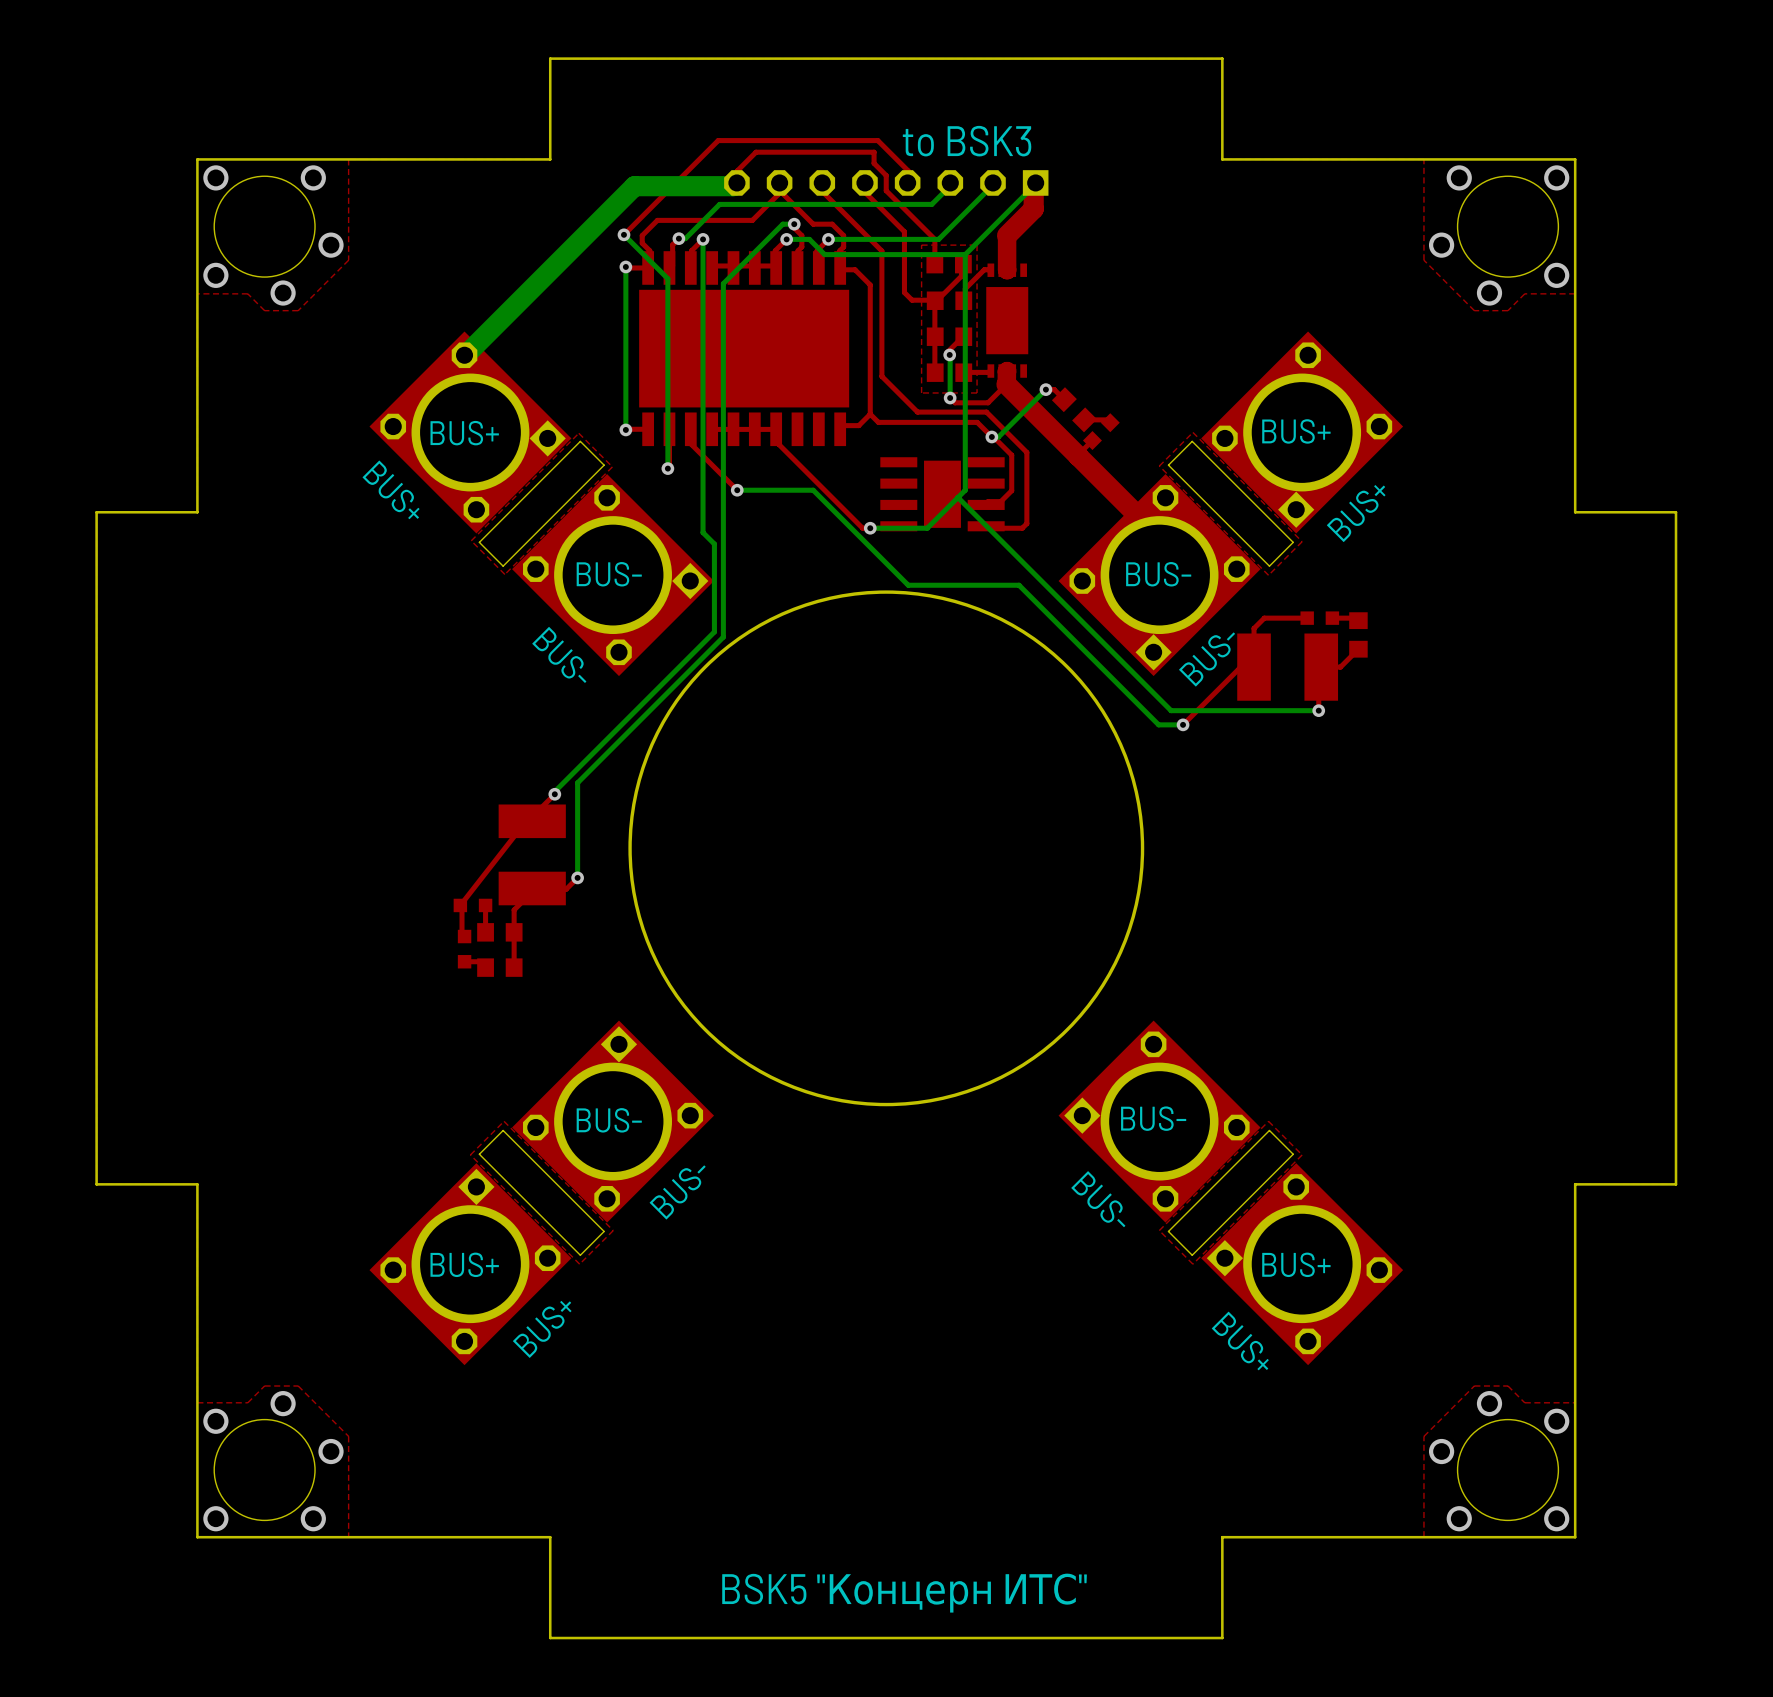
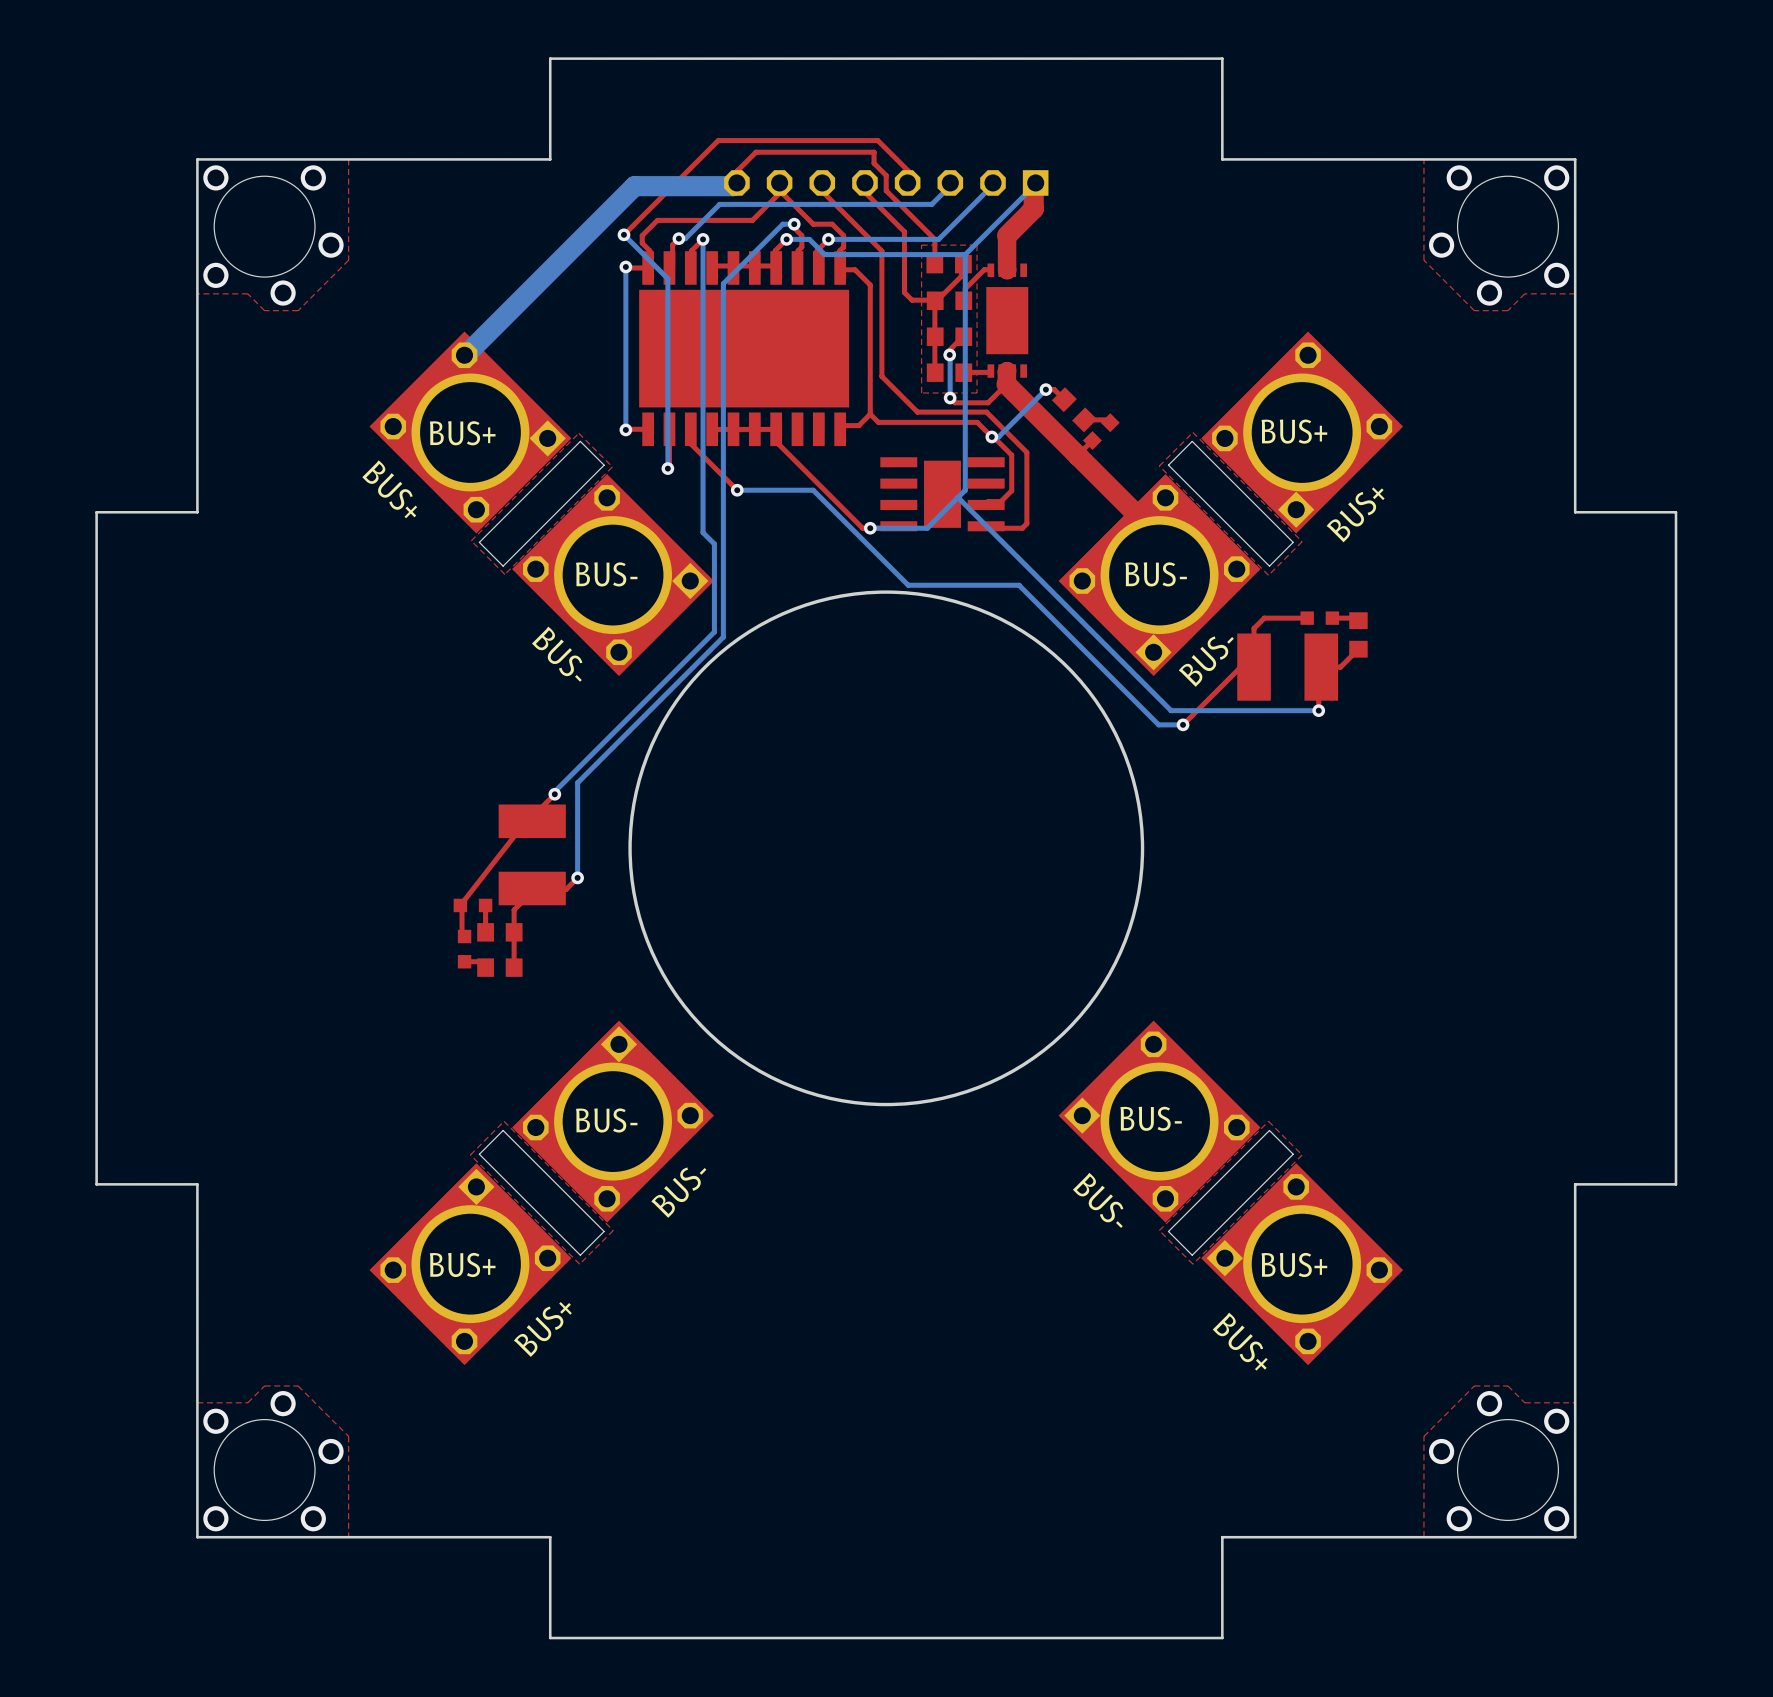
text: to BSK3 (967, 141) -> none
text: BSK5 "Концерн ИТС" (904, 1593) -> none

